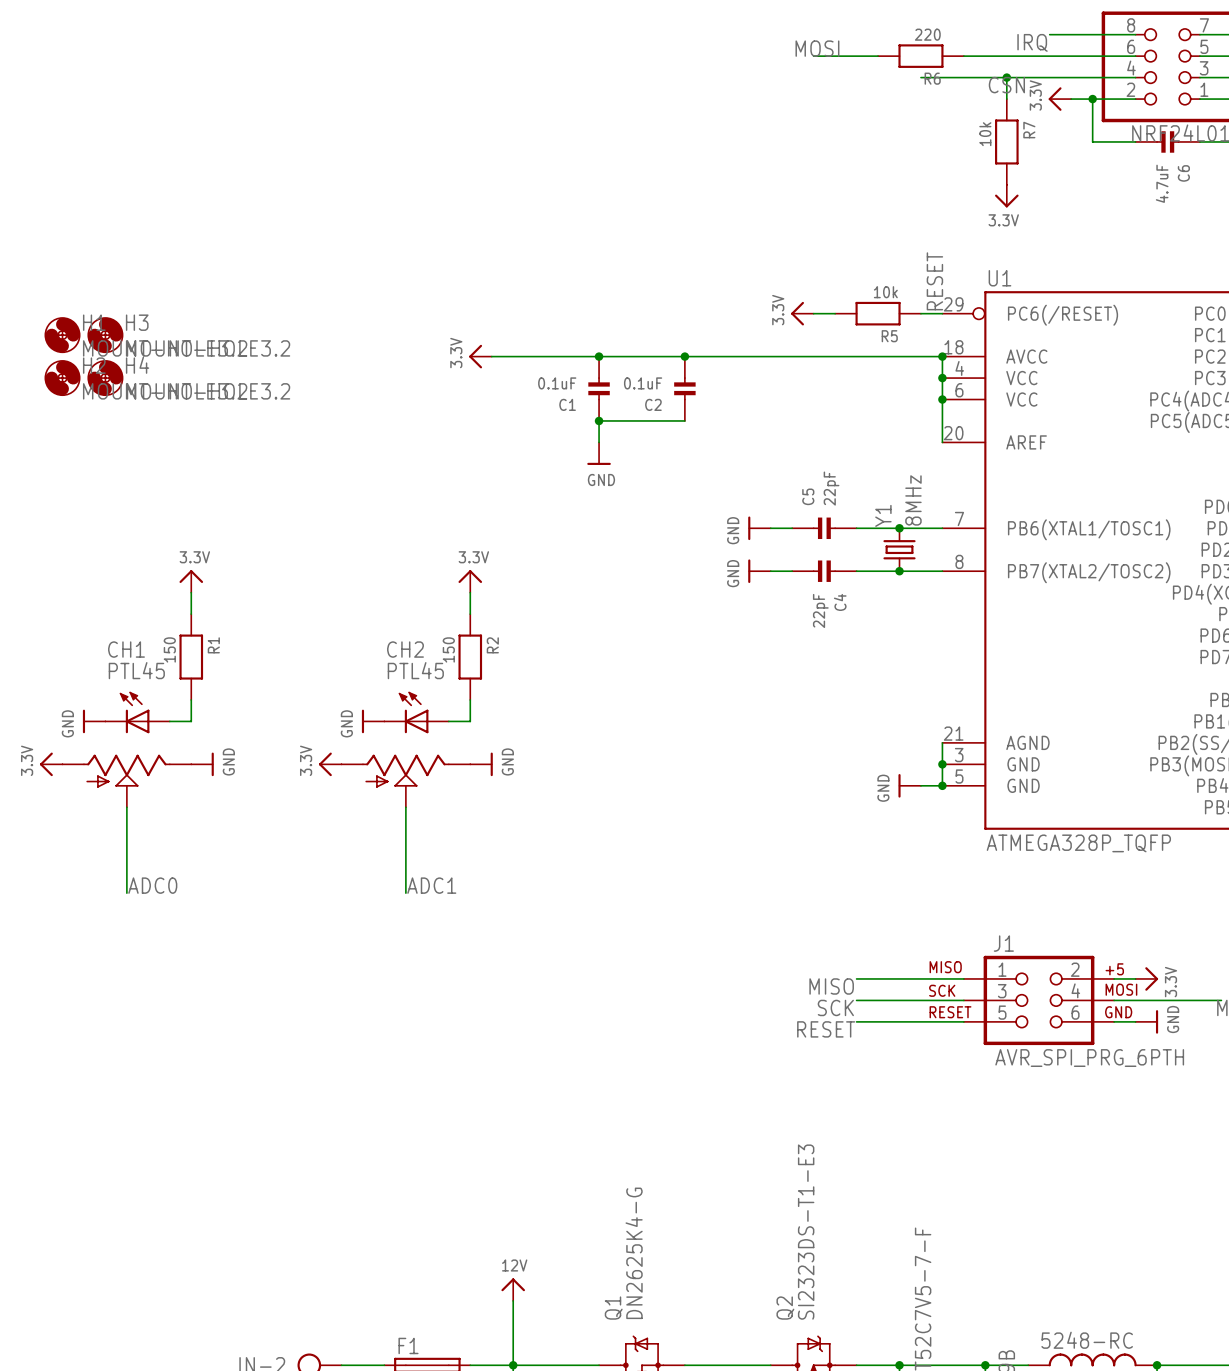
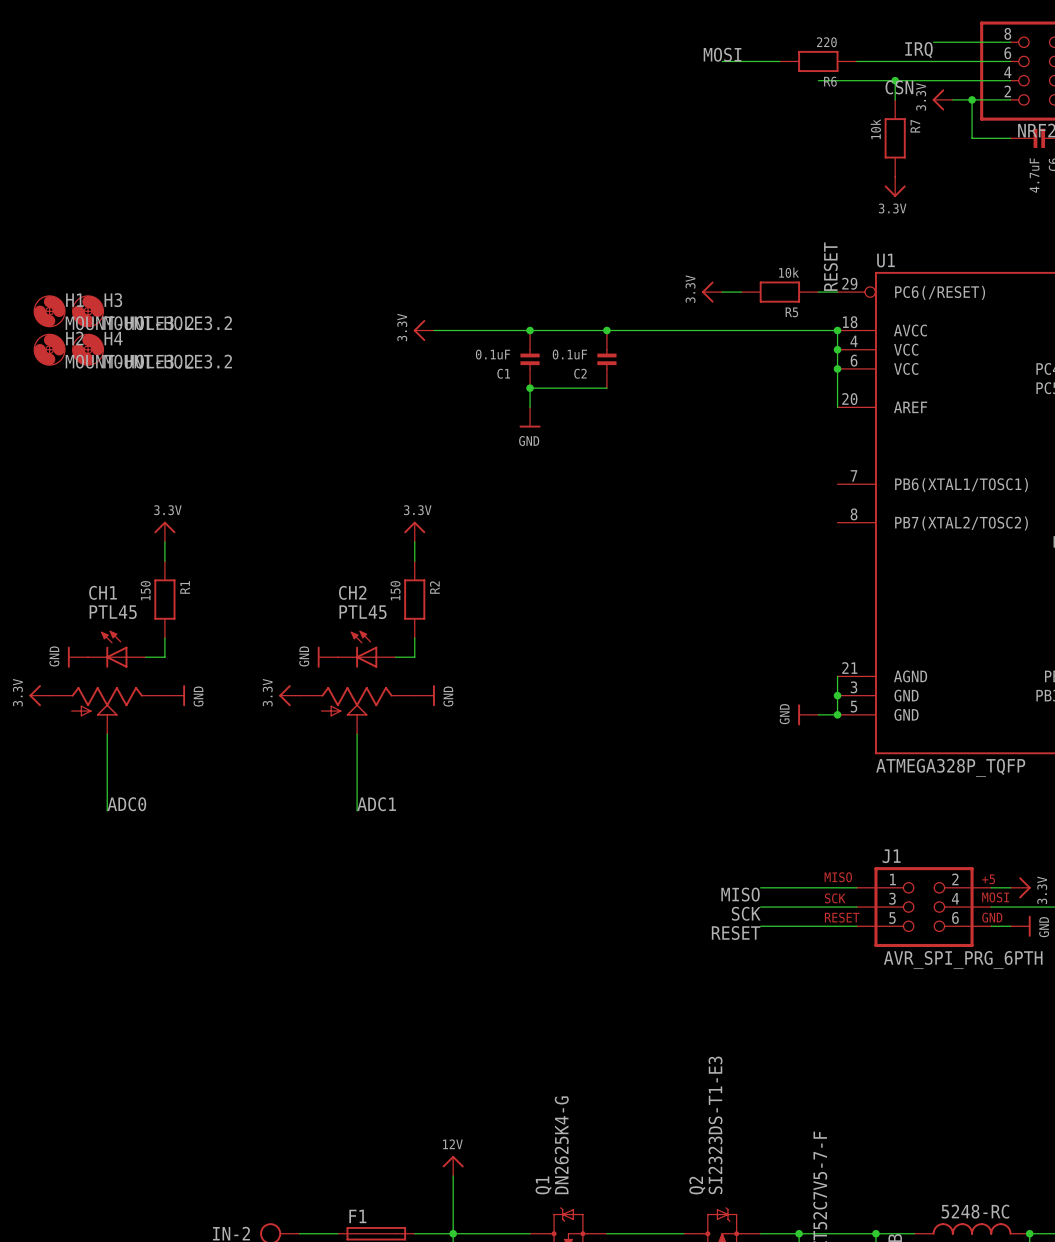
power symbol: GND (759, 528) -> none
wire: (770, 528) (792, 528) -> none
C5: 22pF (824, 528) -> none
wire: (856, 528) (942, 528) -> none
junction: (899, 528) -> none
Y1: 8MHz (899, 549) -> none
power symbol: GND (759, 571) -> none
wire: (770, 571) (792, 571) -> none
C4: 22pF (824, 571) -> none
wire: (856, 571) (942, 571) -> none
junction: (899, 571) -> none

